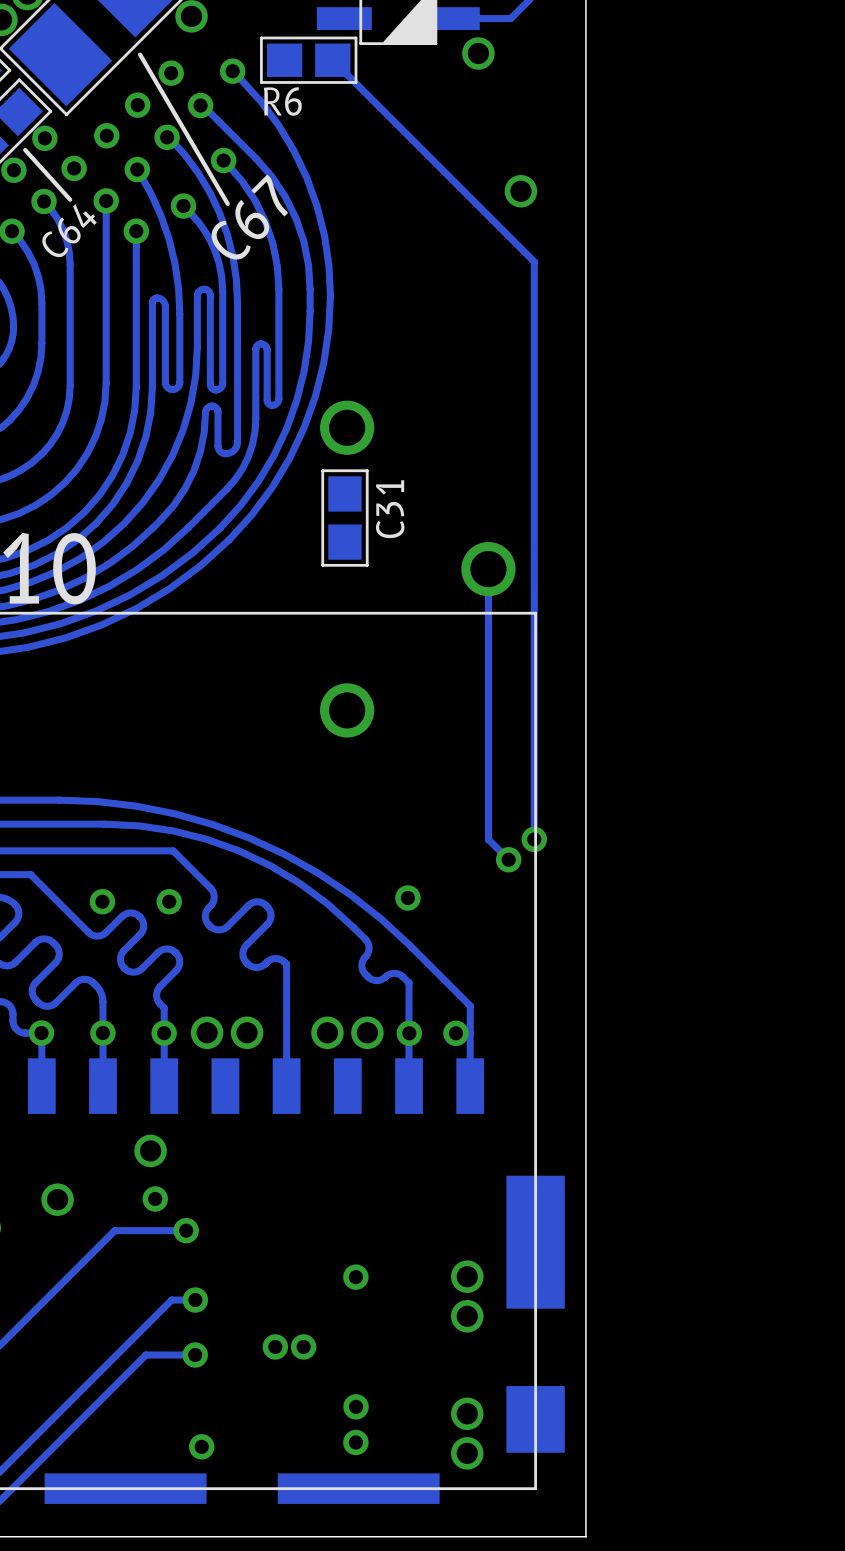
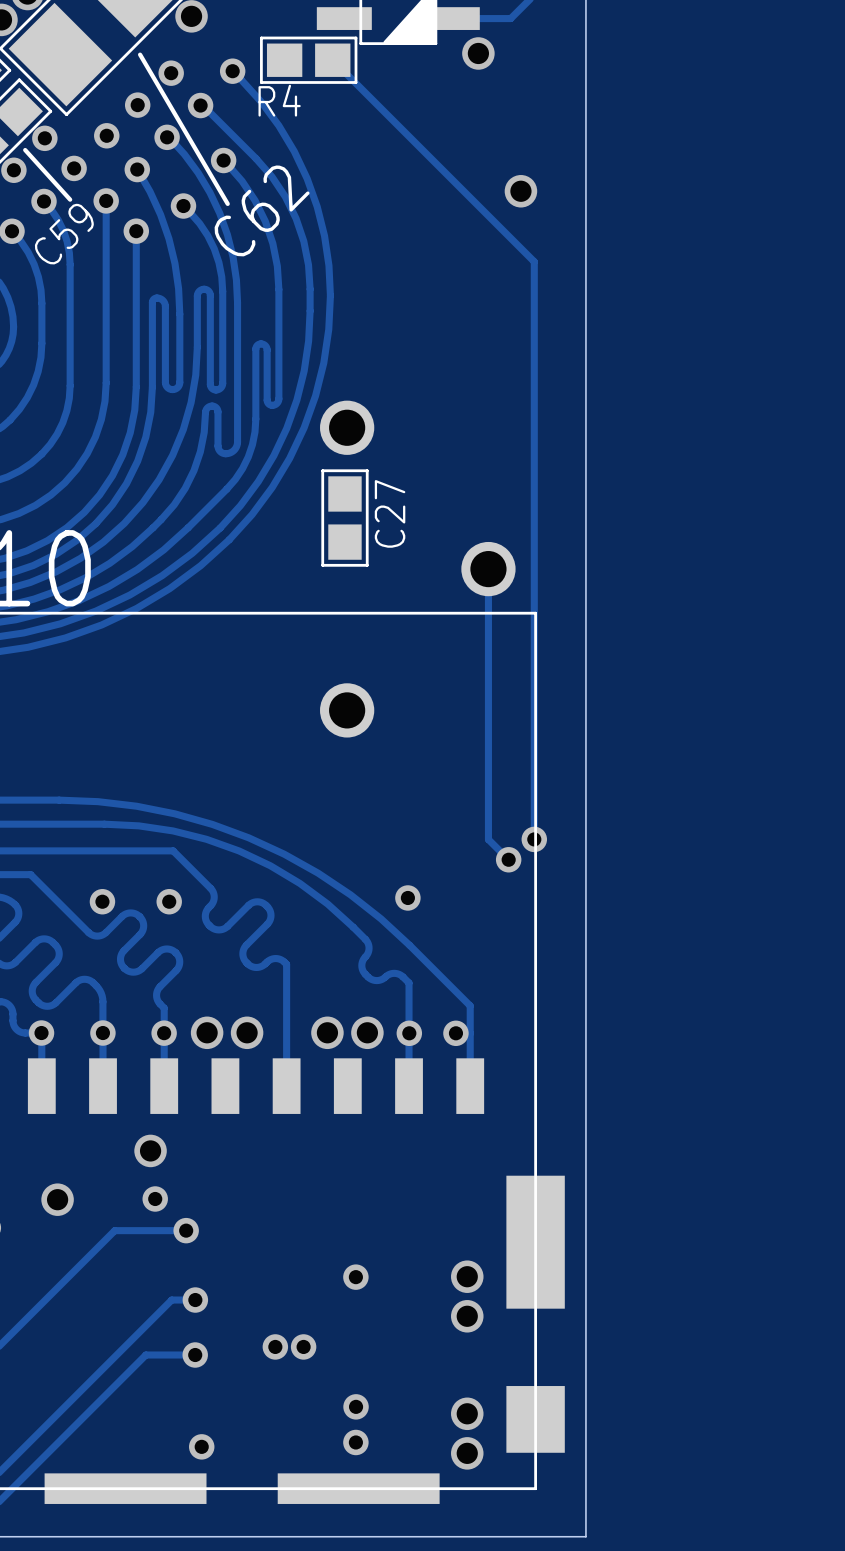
R6 name: R6 (282, 101) -> R4 (279, 100)
C67 name: C67 (249, 217) -> C62 (262, 210)
C64 name: C64 (69, 230) -> C59 (64, 234)
C31 name: C31 (390, 509) -> C27 (390, 513)

